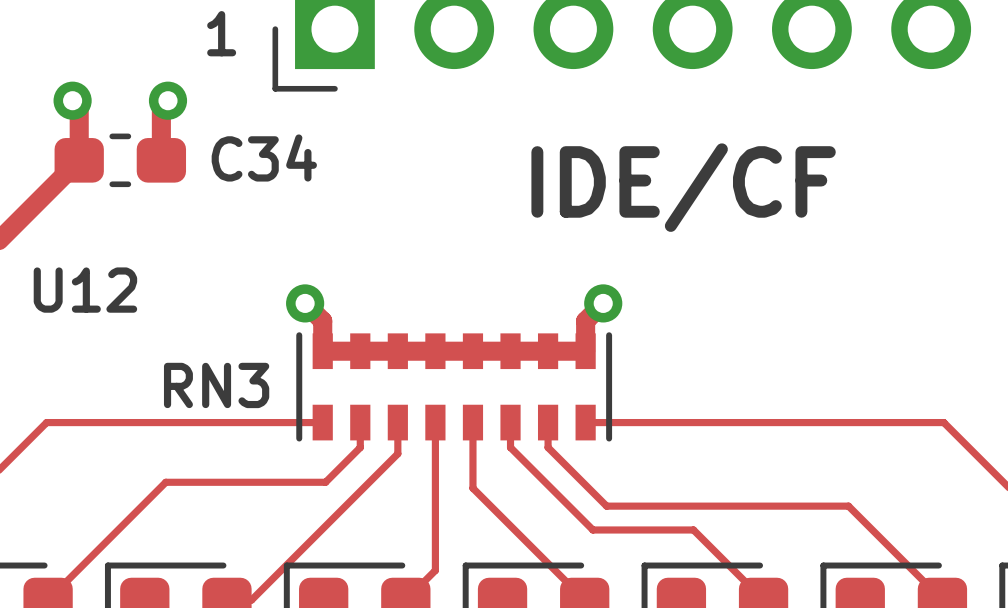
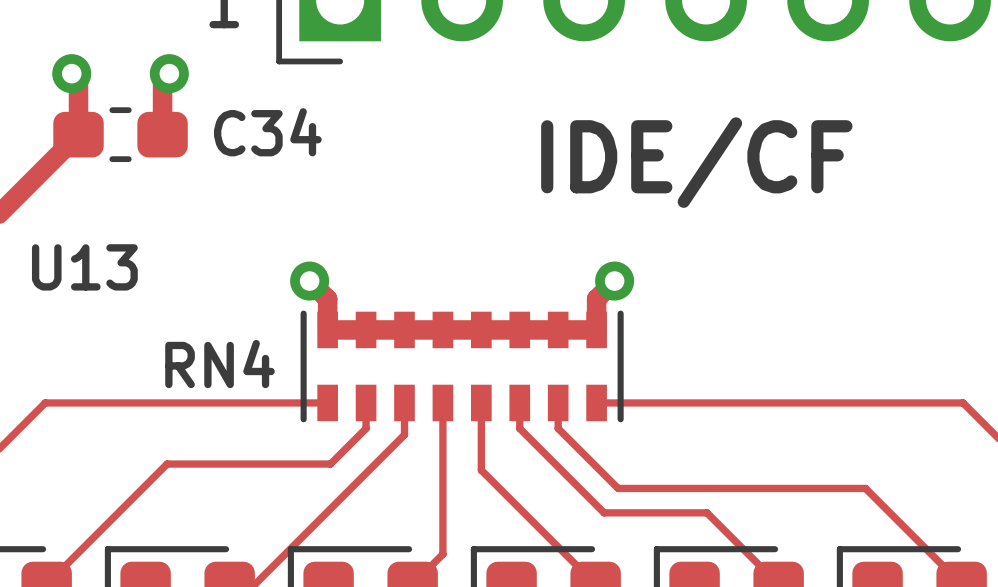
U12 name: U12 (85, 290) -> U13 (84, 267)
RN3 name: RN3 (216, 385) -> RN4 (219, 364)

